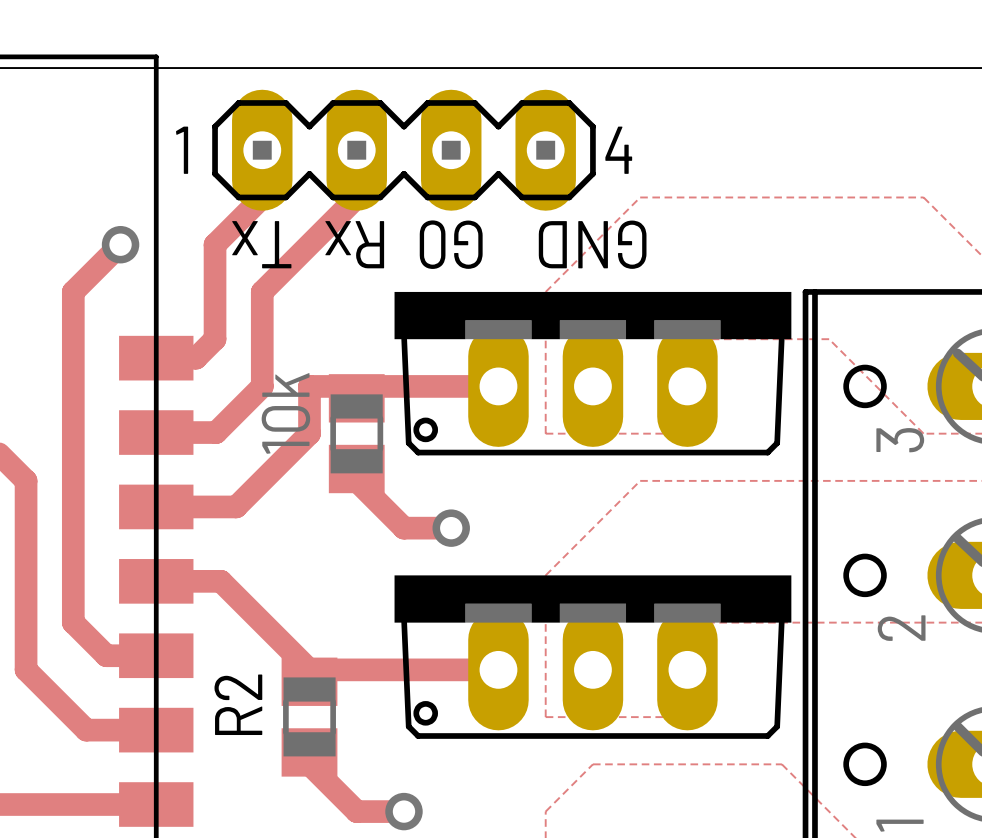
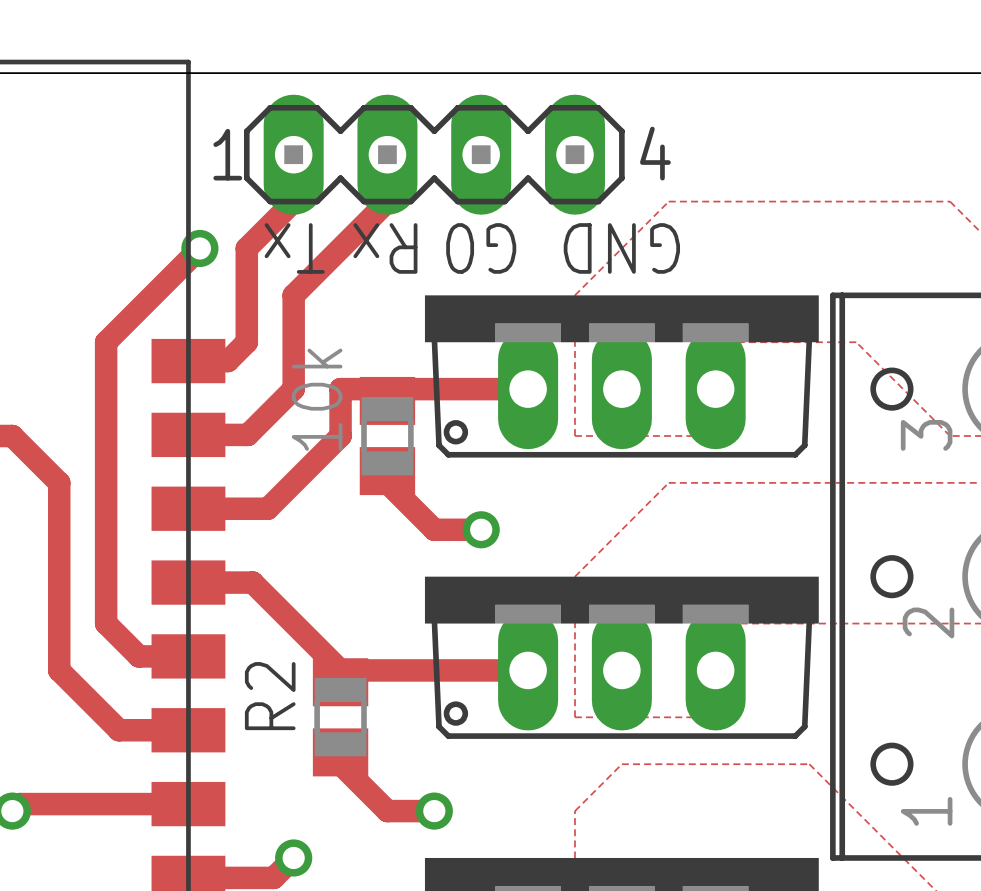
track: (120, 244) (73, 291) (73, 339) -> (199, 248) (106, 342)
via position: (120, 244) -> (199, 248)

